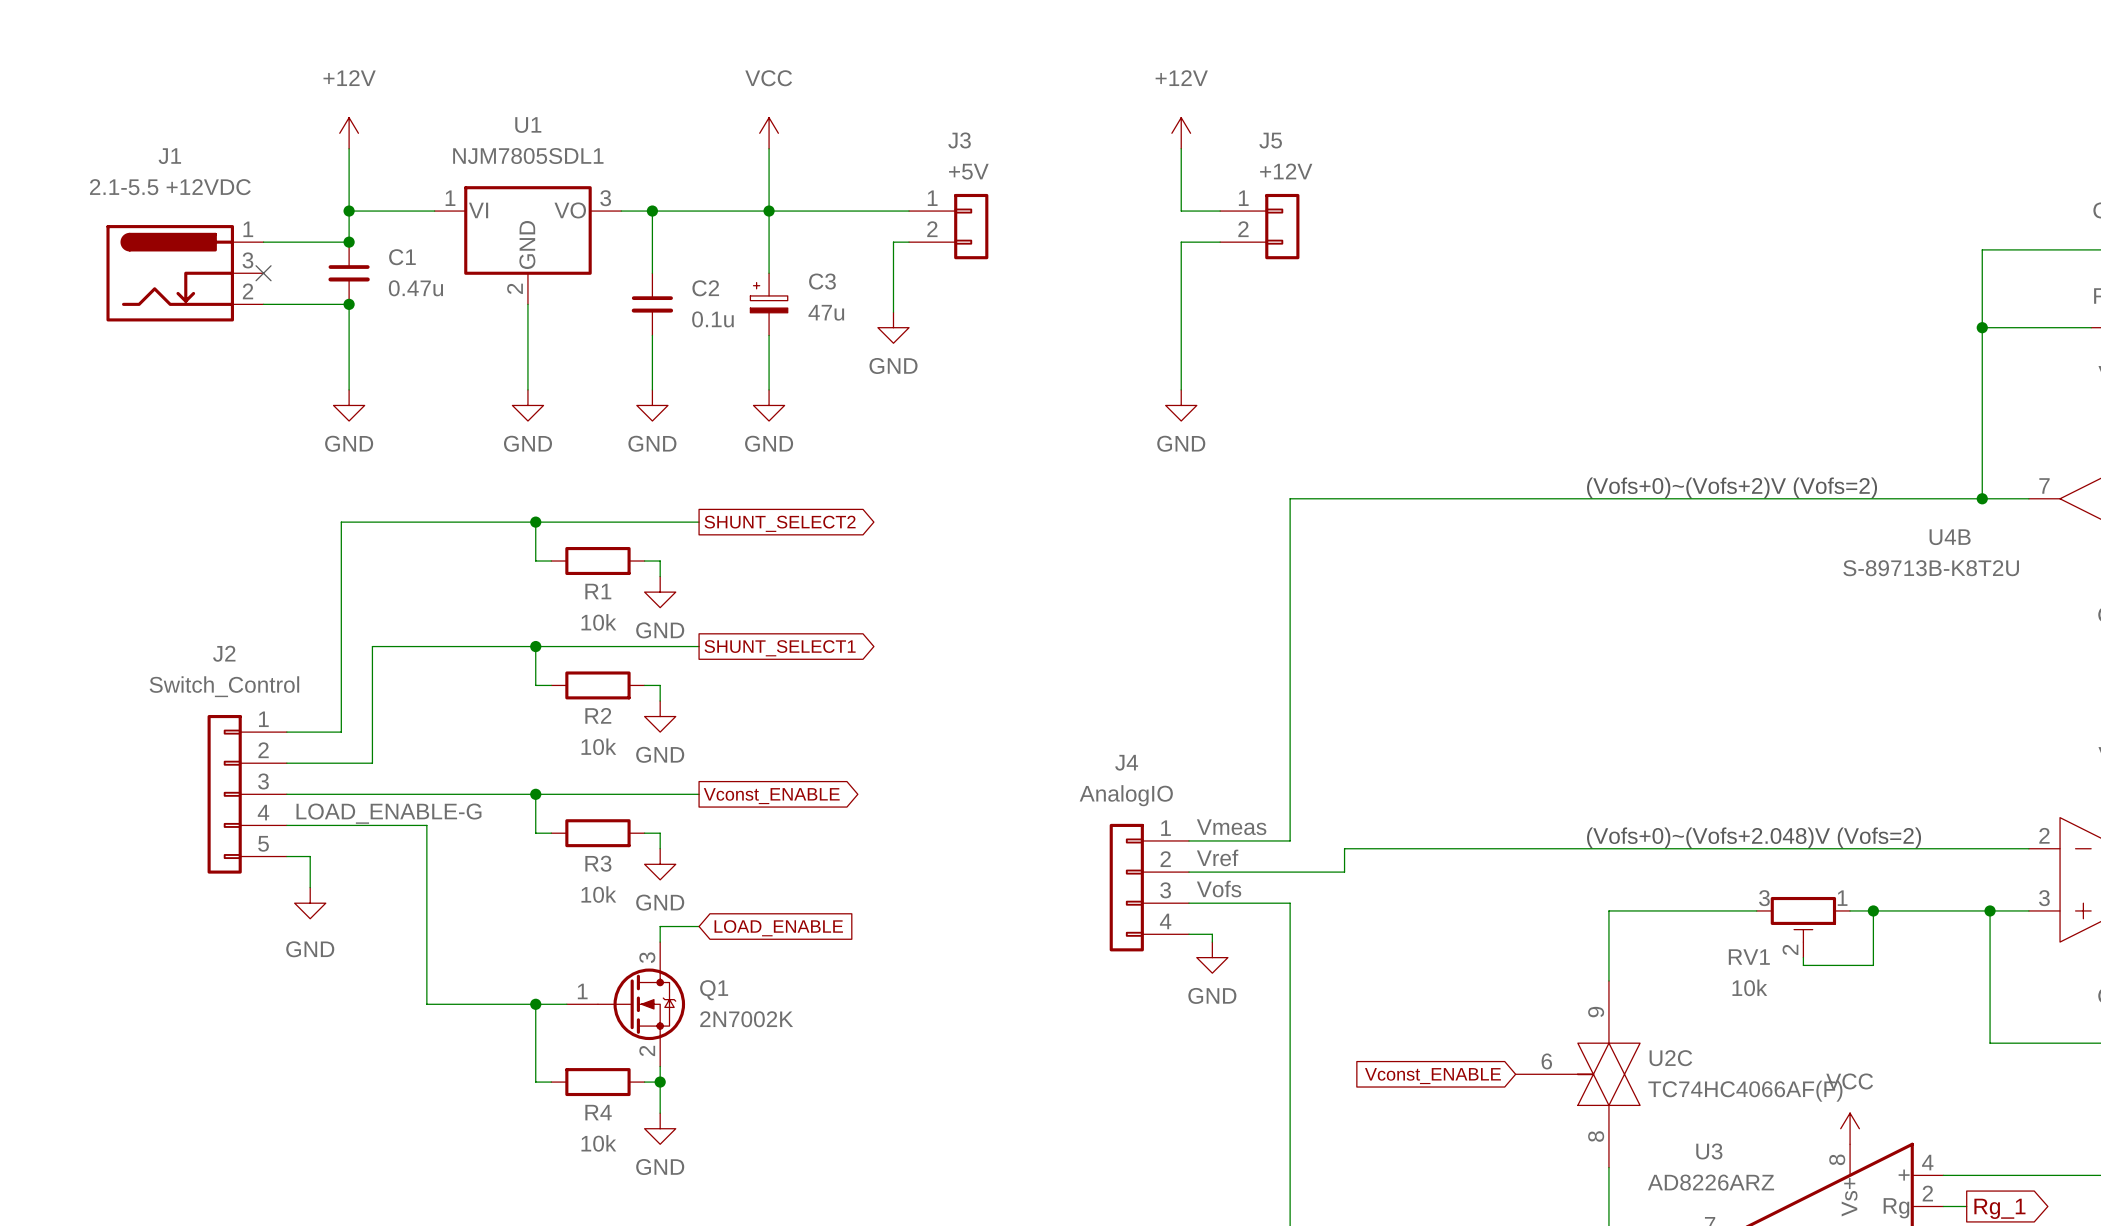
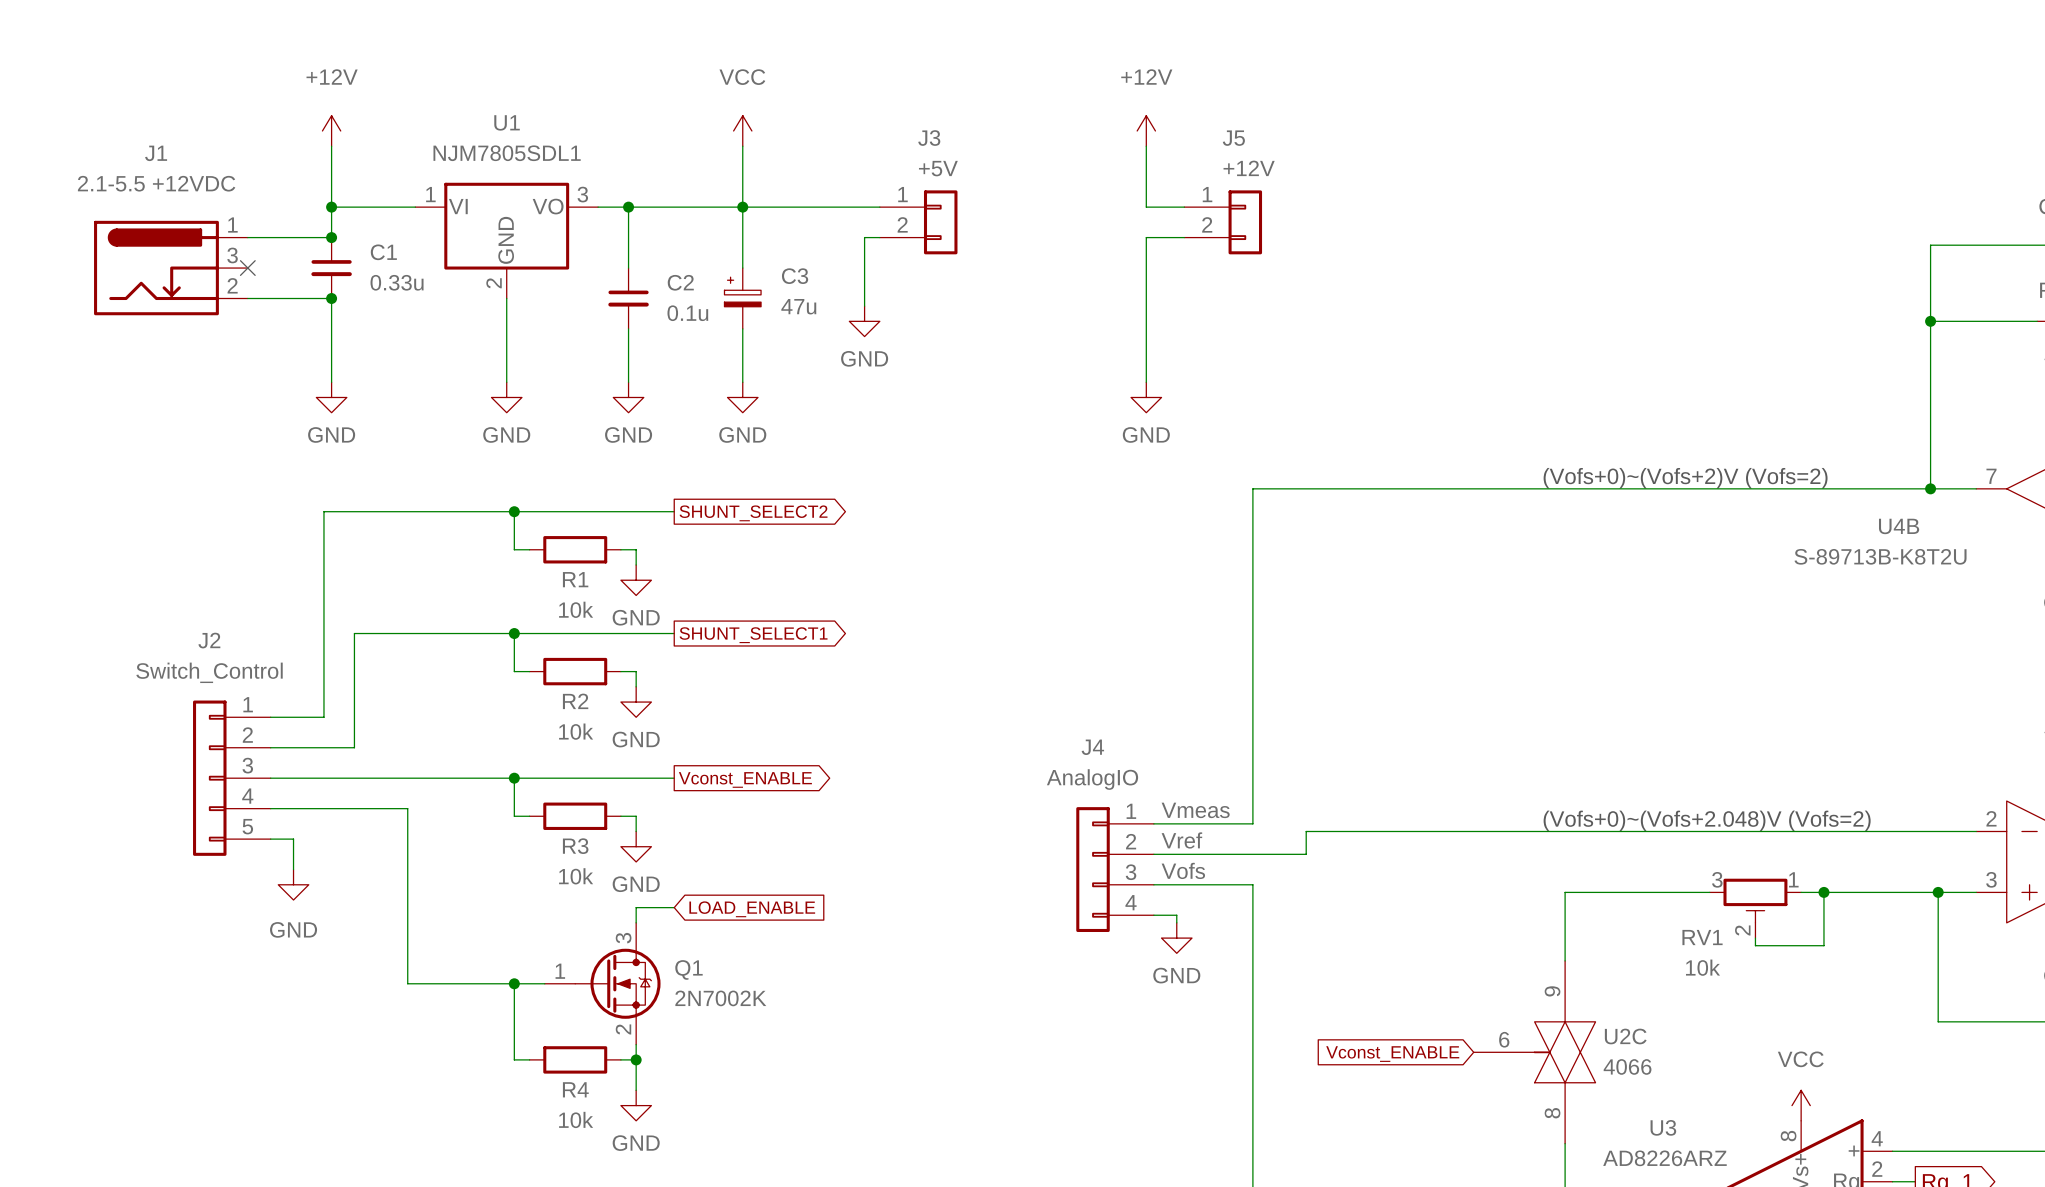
C1 value: 0.47u (415, 288) -> 0.33u (397, 282)
label: LOAD_ENABLE-G (388, 813) -> none
U2C value: TC74HC4066AF(F) (1745, 1091) -> 4066 (1627, 1066)

